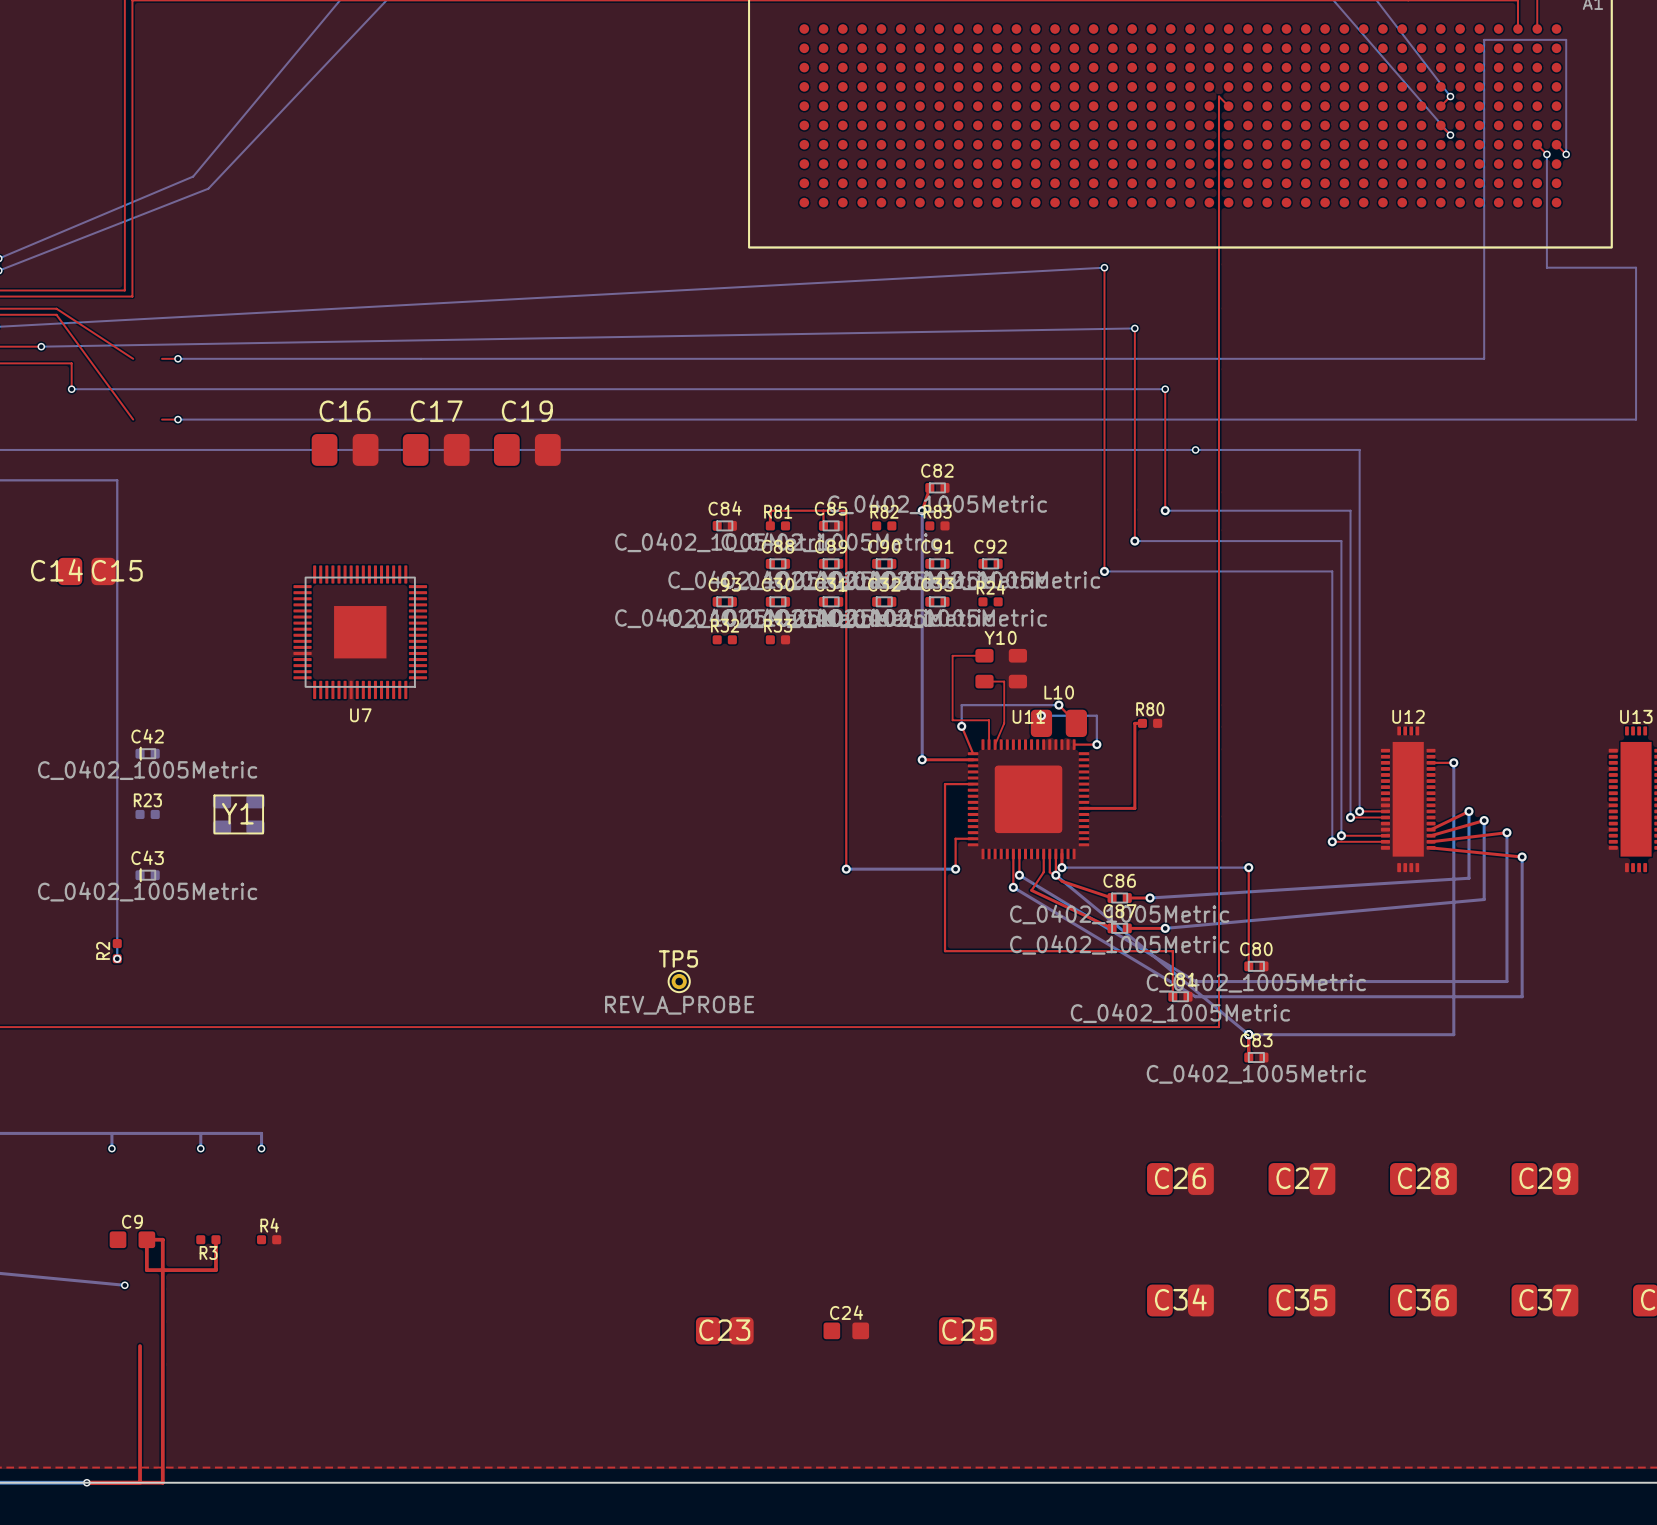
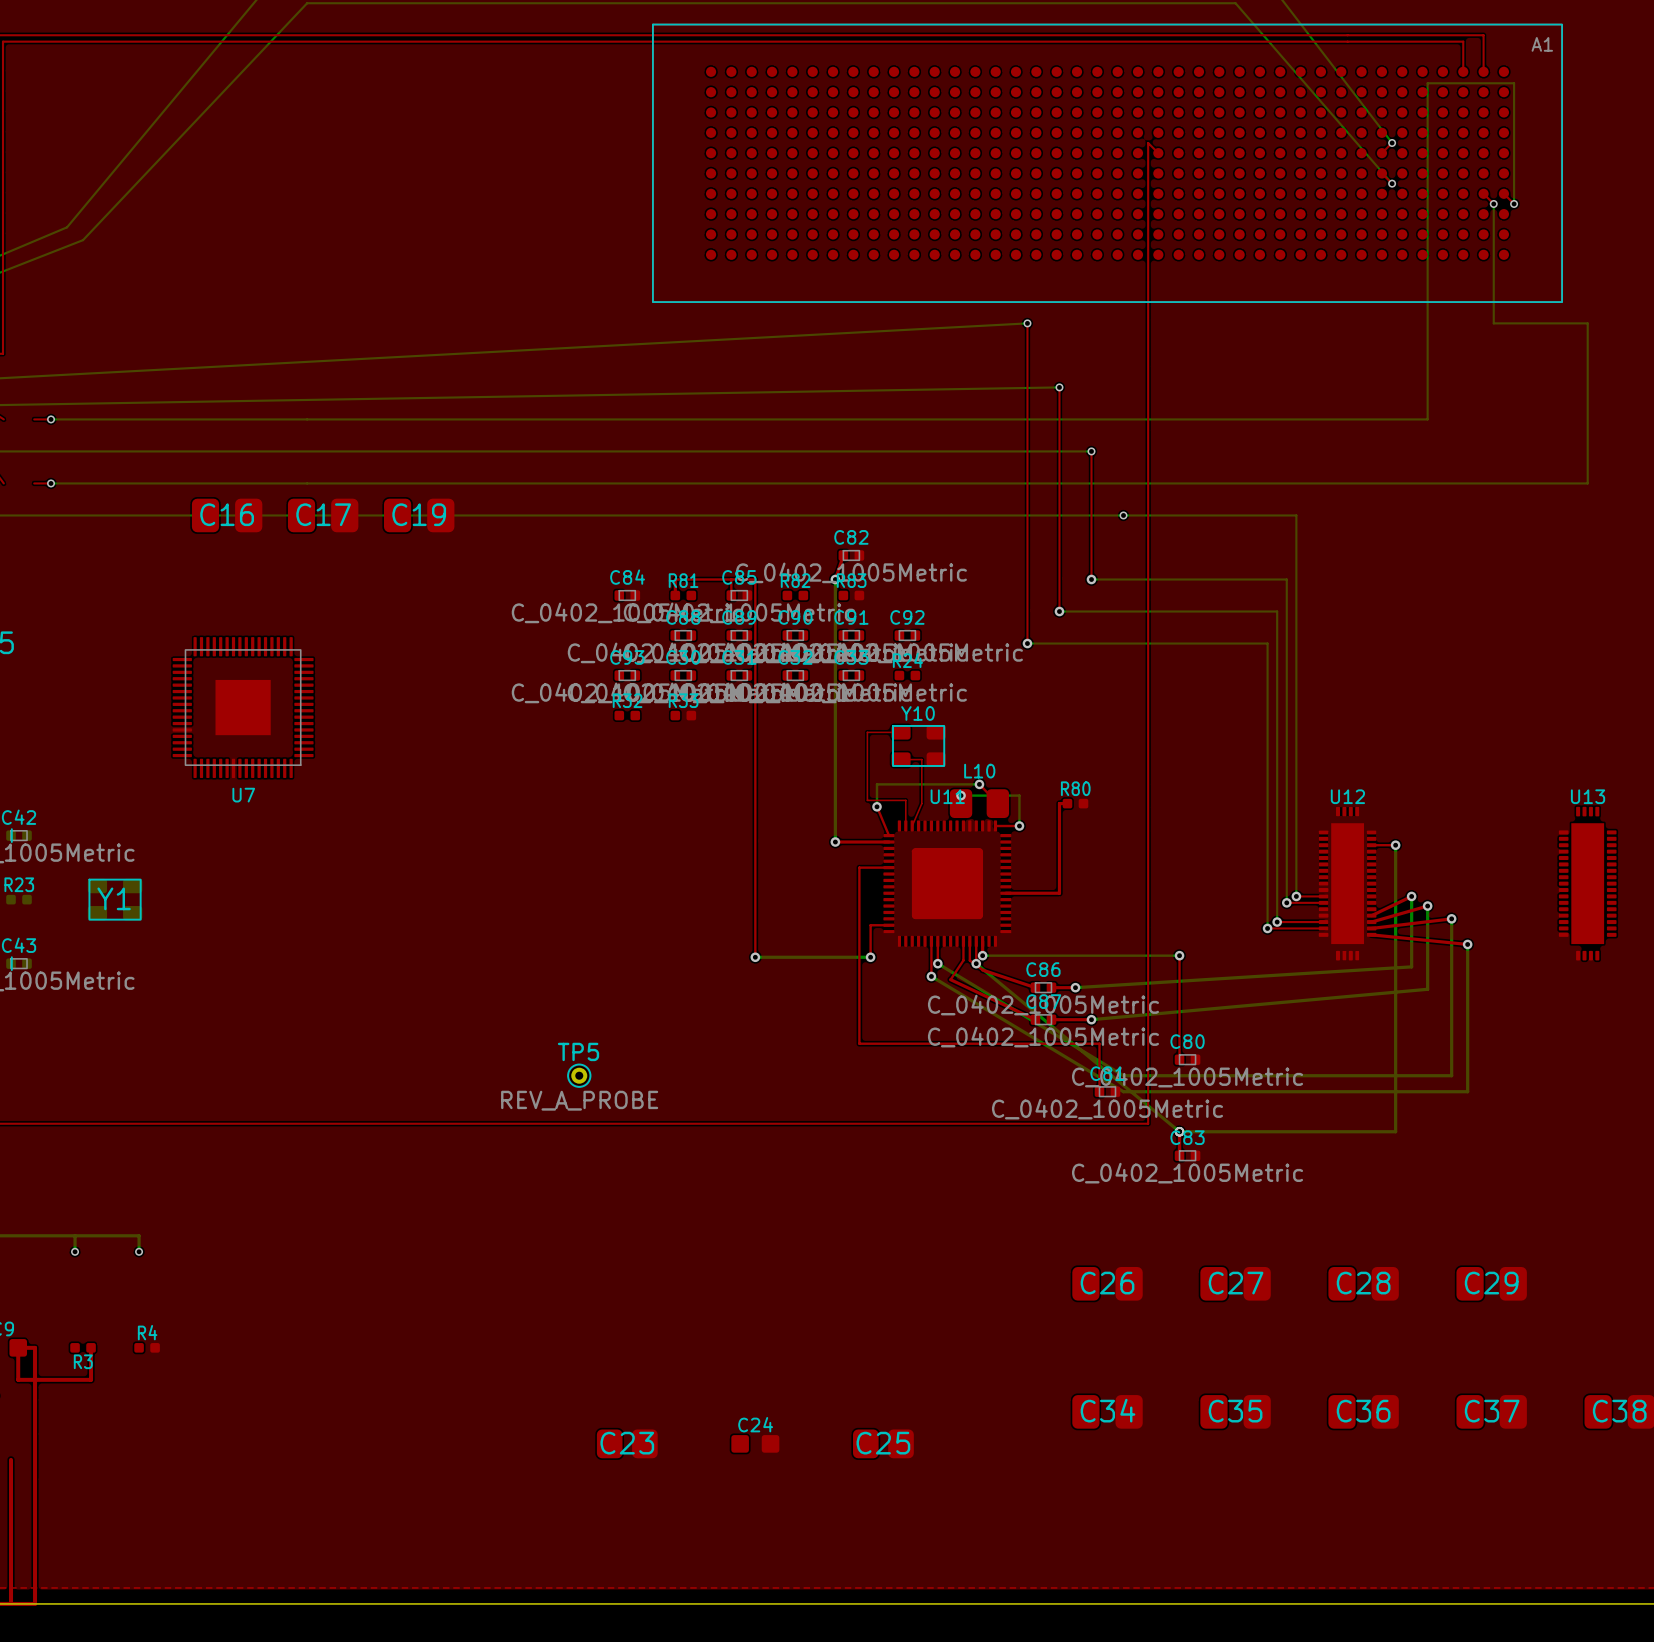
C16 name position: C16 (345, 411) -> C16 (227, 514)
C17 name position: C17 (436, 411) -> C17 (323, 514)
C19 name position: C19 (527, 411) -> C19 (419, 514)
Y10 footprint: [975, 648, 1028, 689] -> [891, 725, 946, 767]

